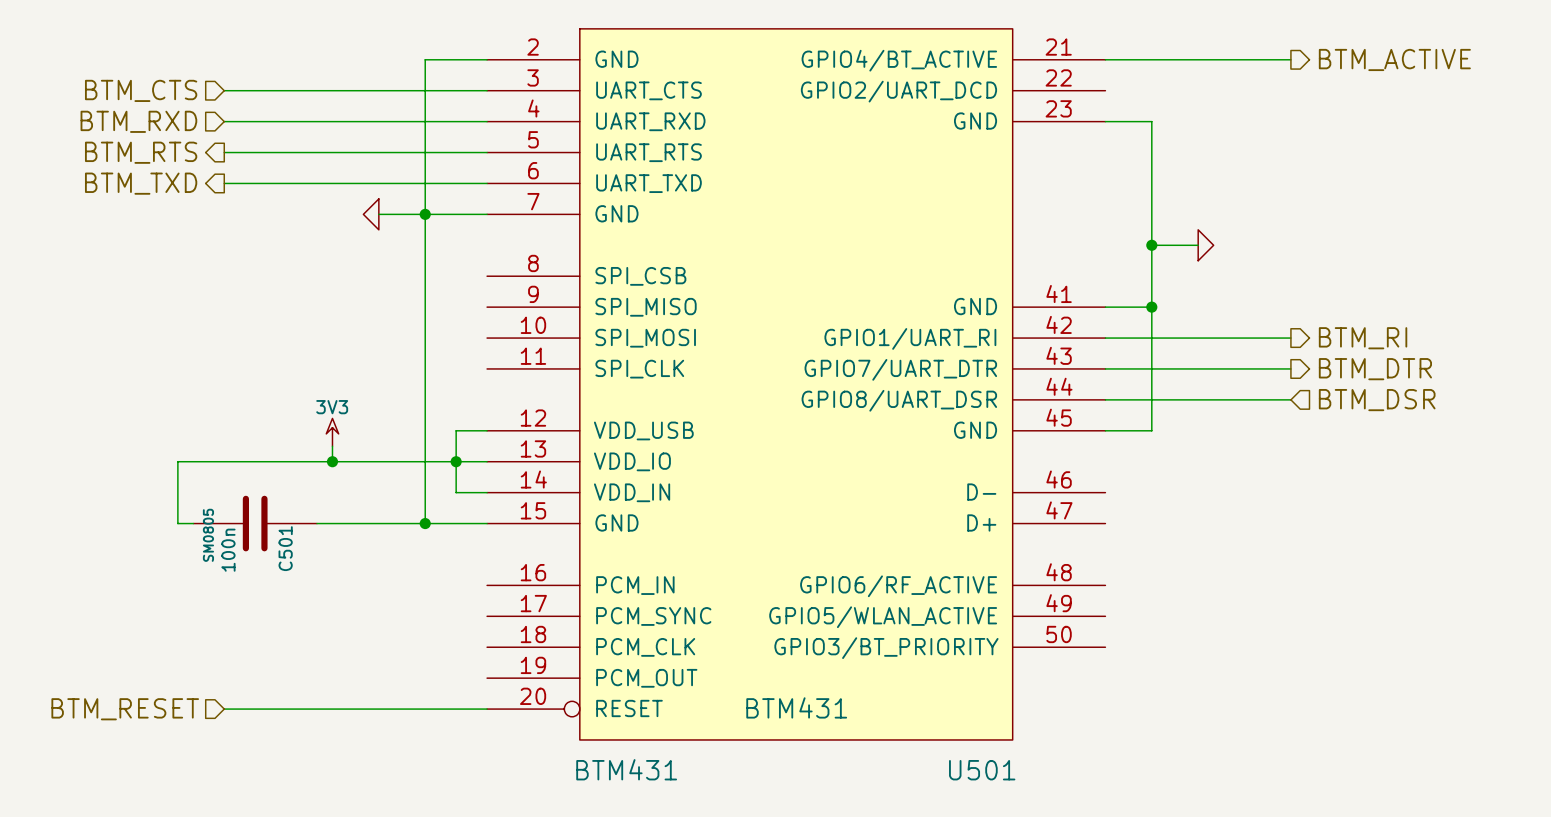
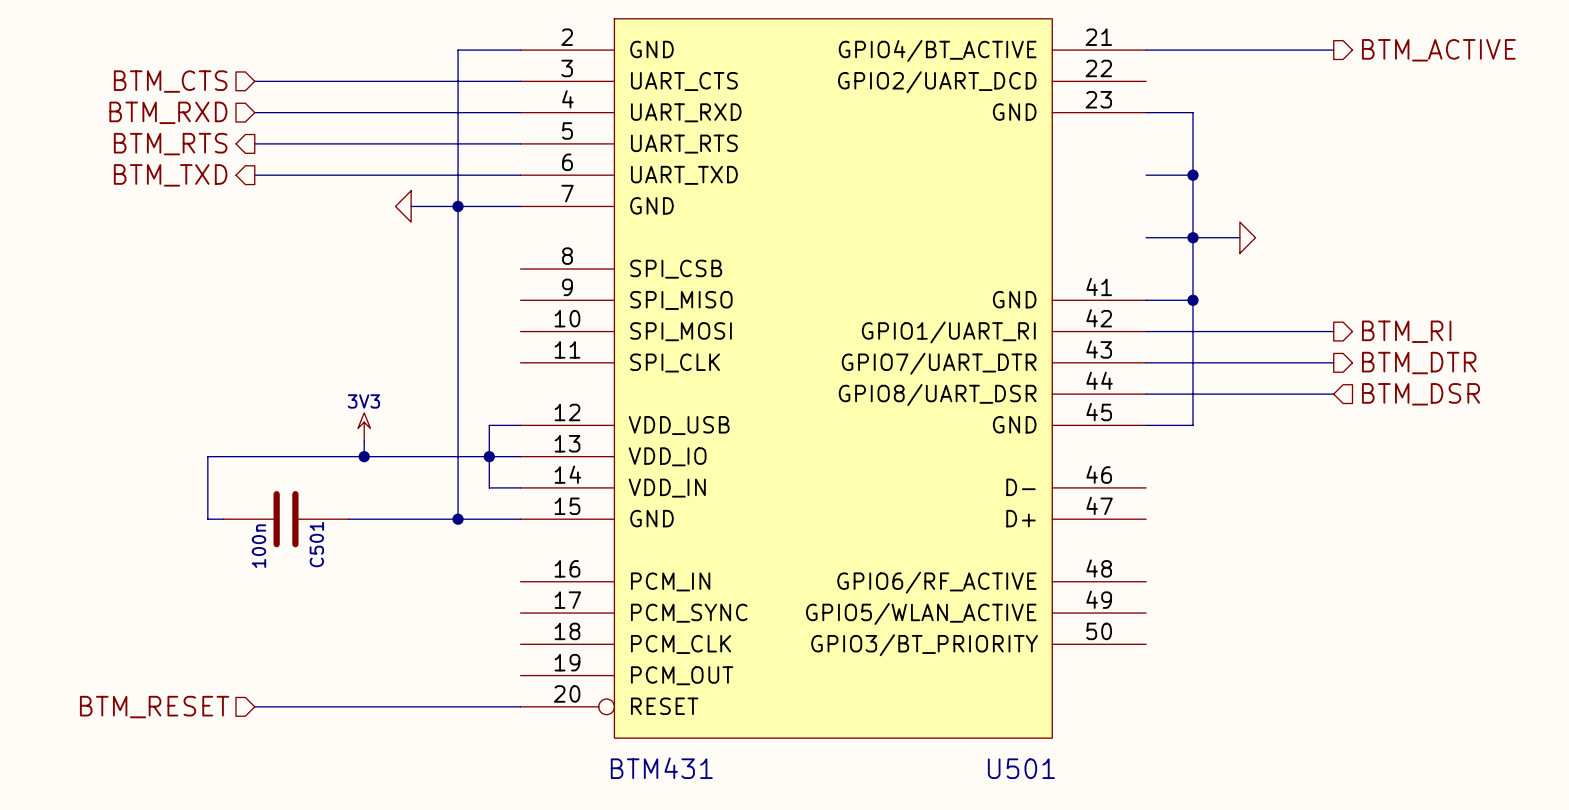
wire: none -> (1146, 175) (1193, 175)
junction: none -> (1193, 175)
wire: none -> (1146, 237) (1193, 237)
C501 text: SM0805 (208, 535) -> none
U501 text: BTM431 (796, 707) -> none

